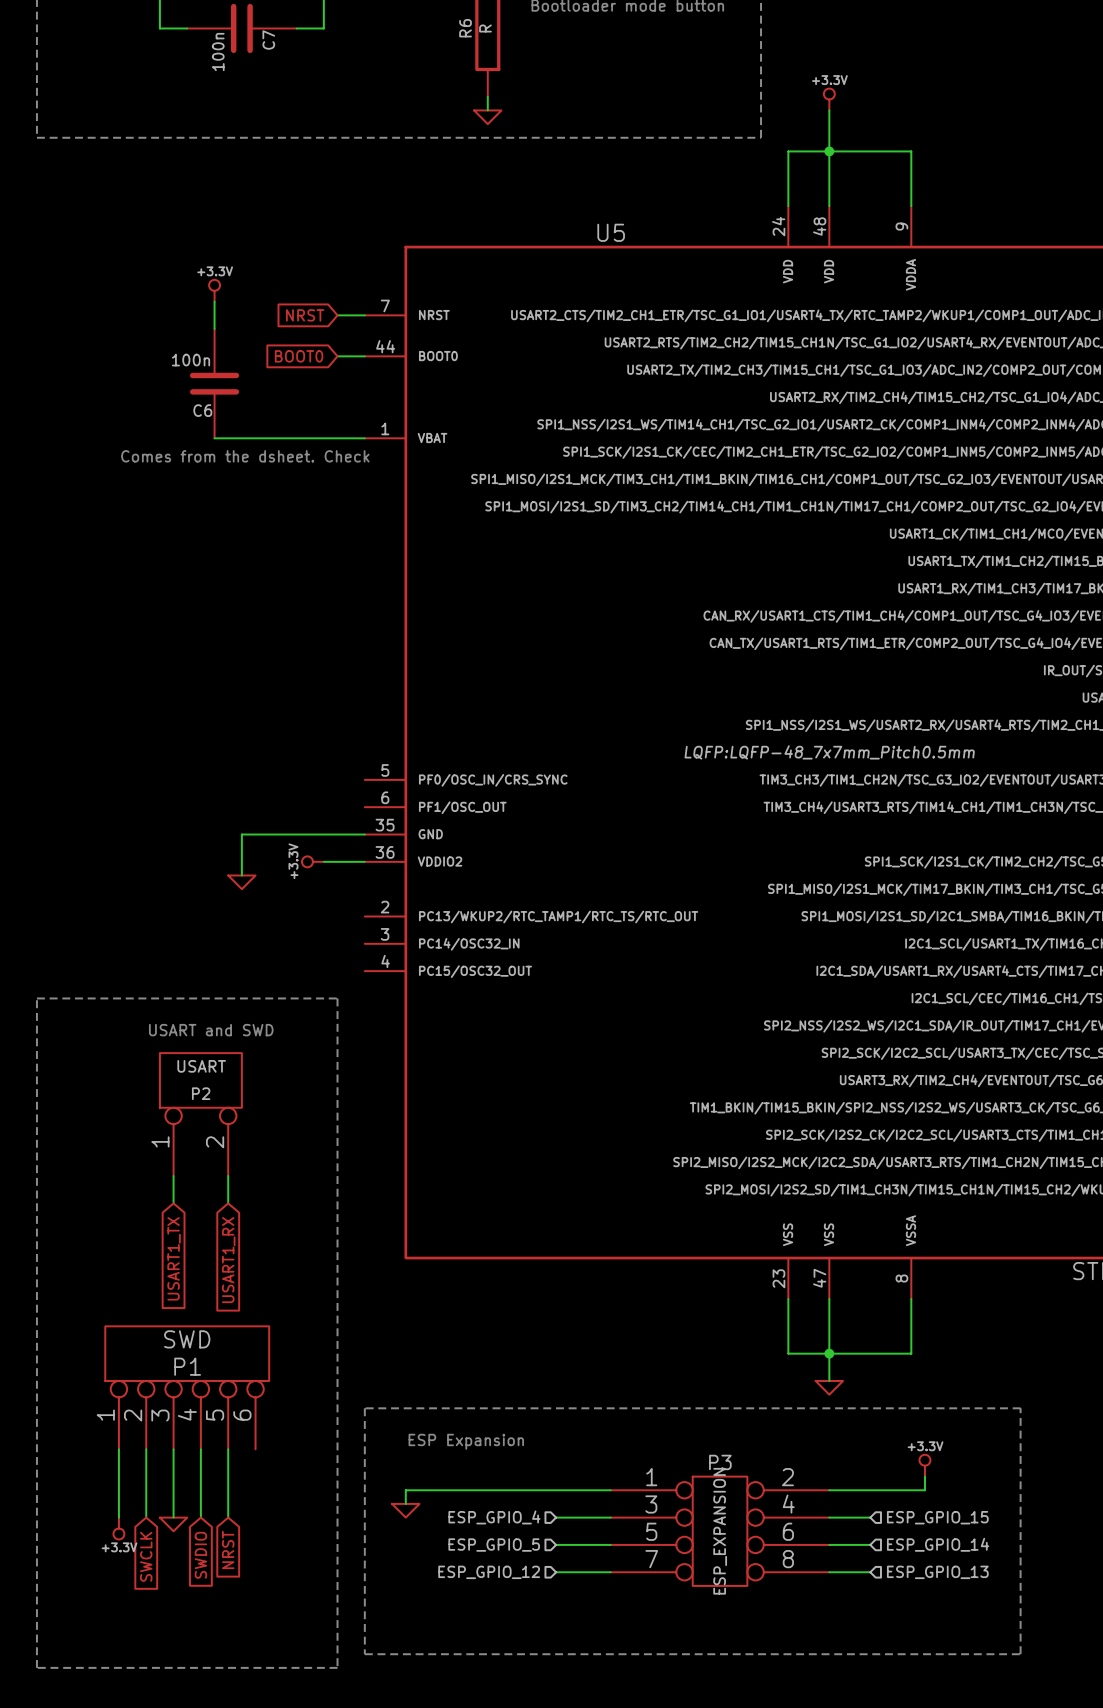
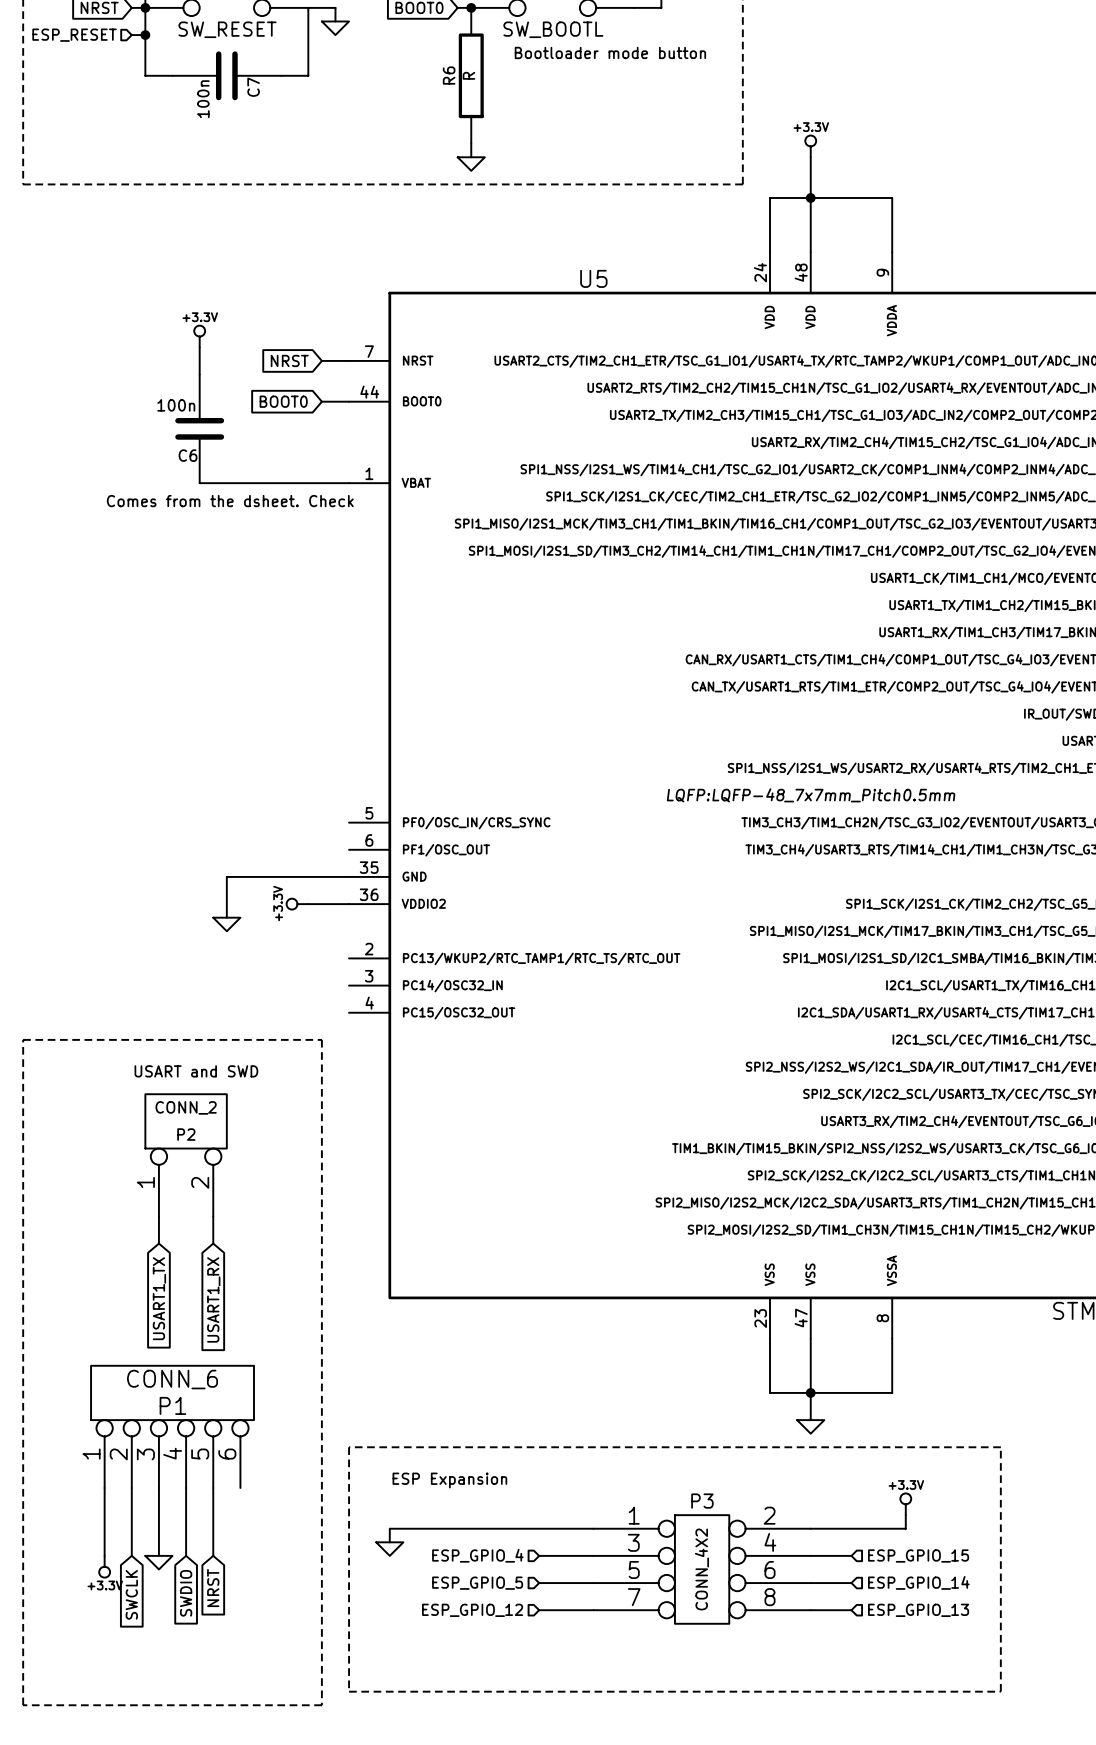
P2 value: USART (201, 1066) -> CONN_2 (186, 1107)
P1 value: SWD (187, 1339) -> CONN_6 (172, 1379)
P3 value: ESP_EXPANSION (720, 1531) -> CONN_4X2 (701, 1569)

